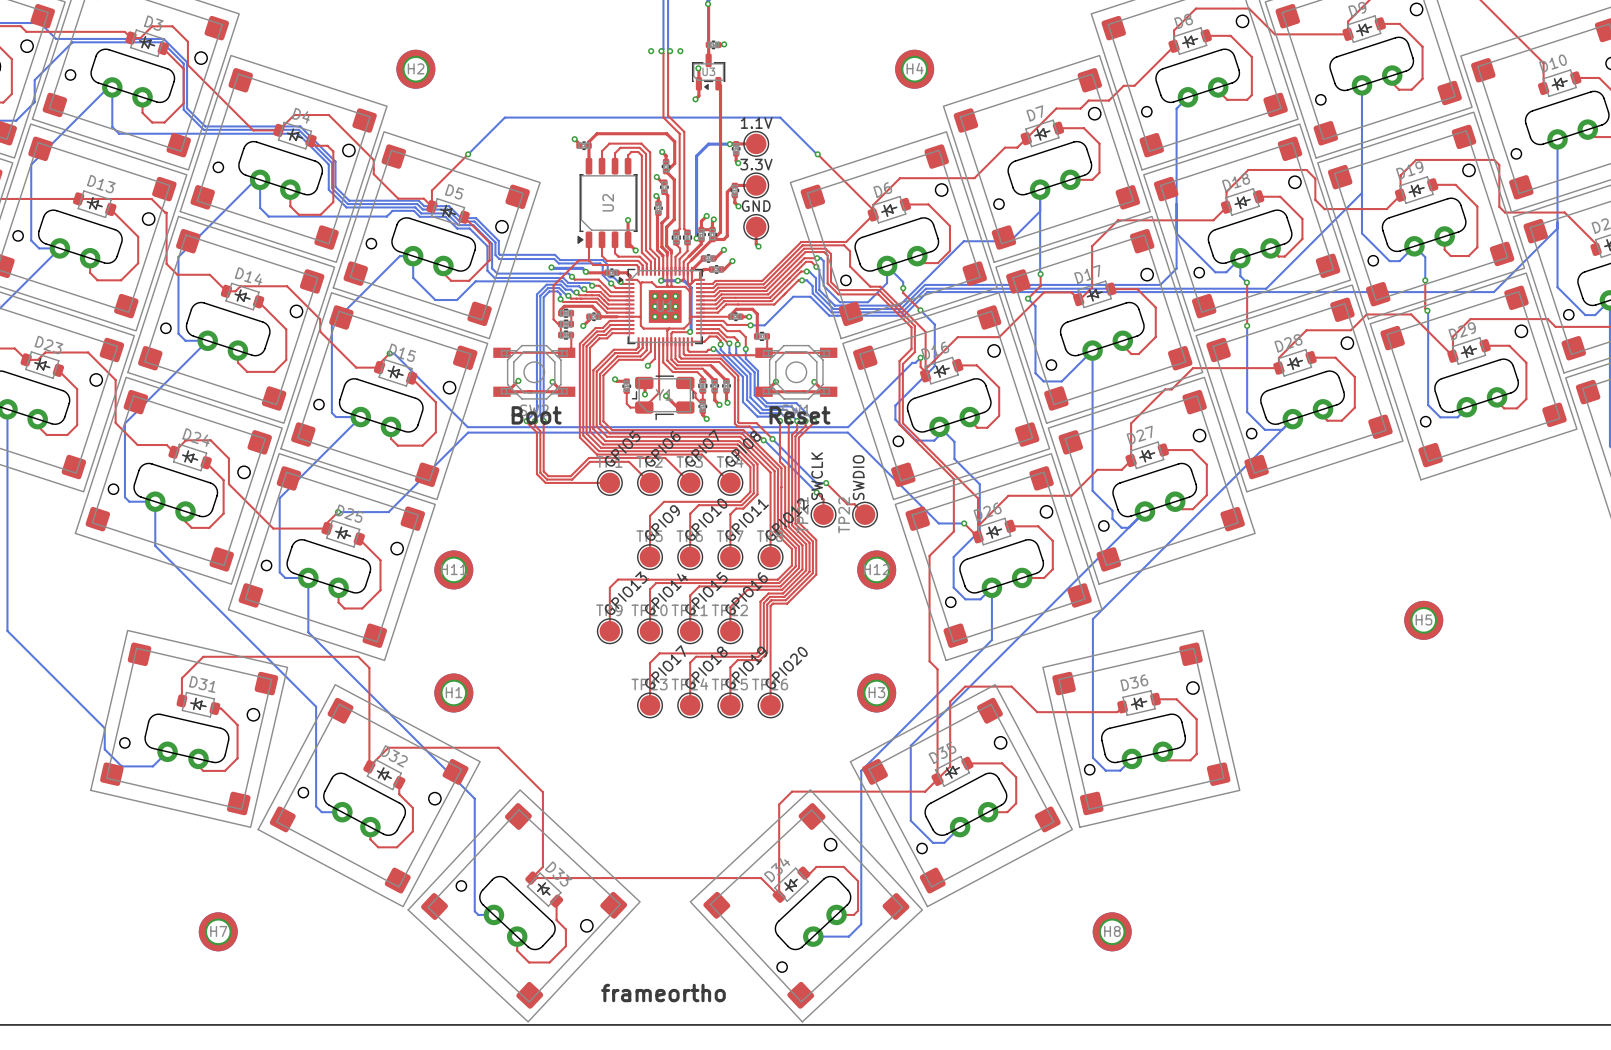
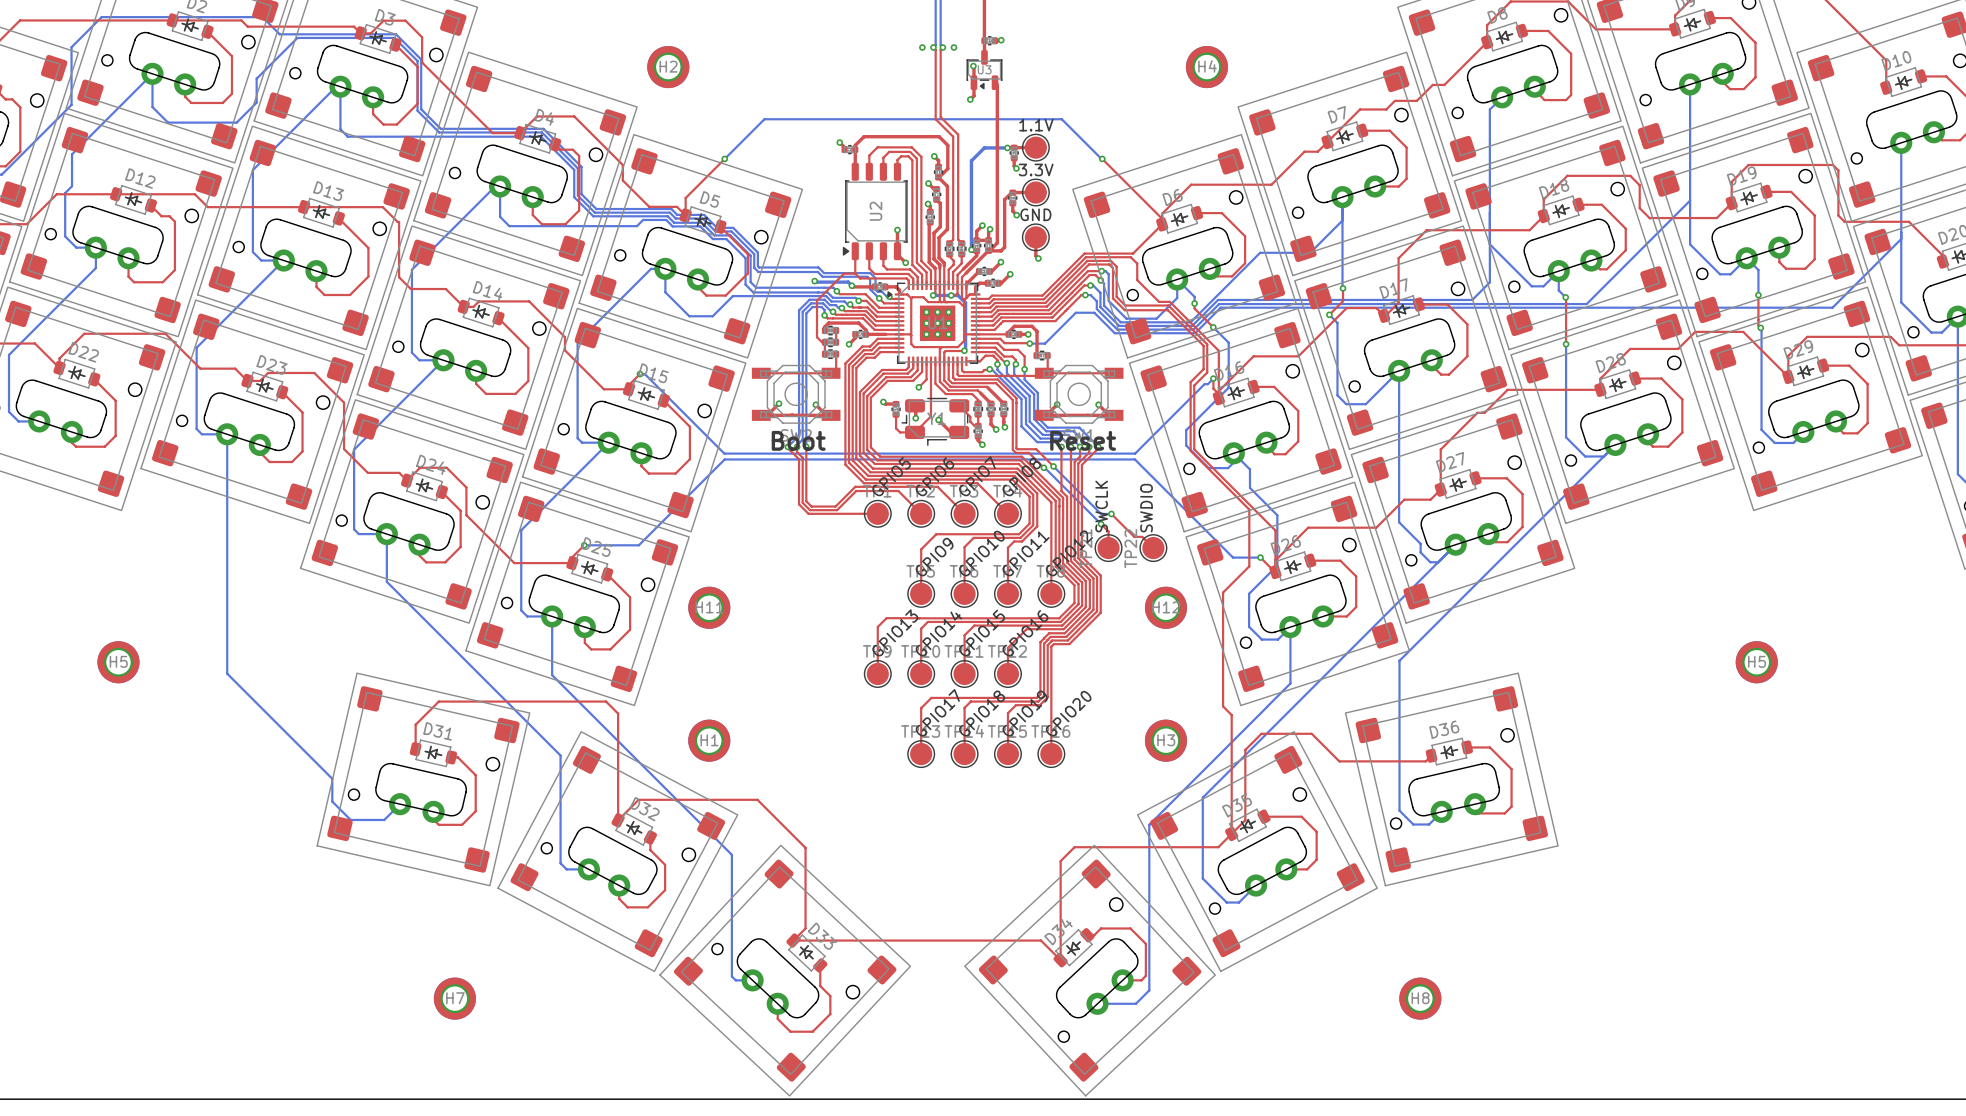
text: frameortho (663, 993) -> none

